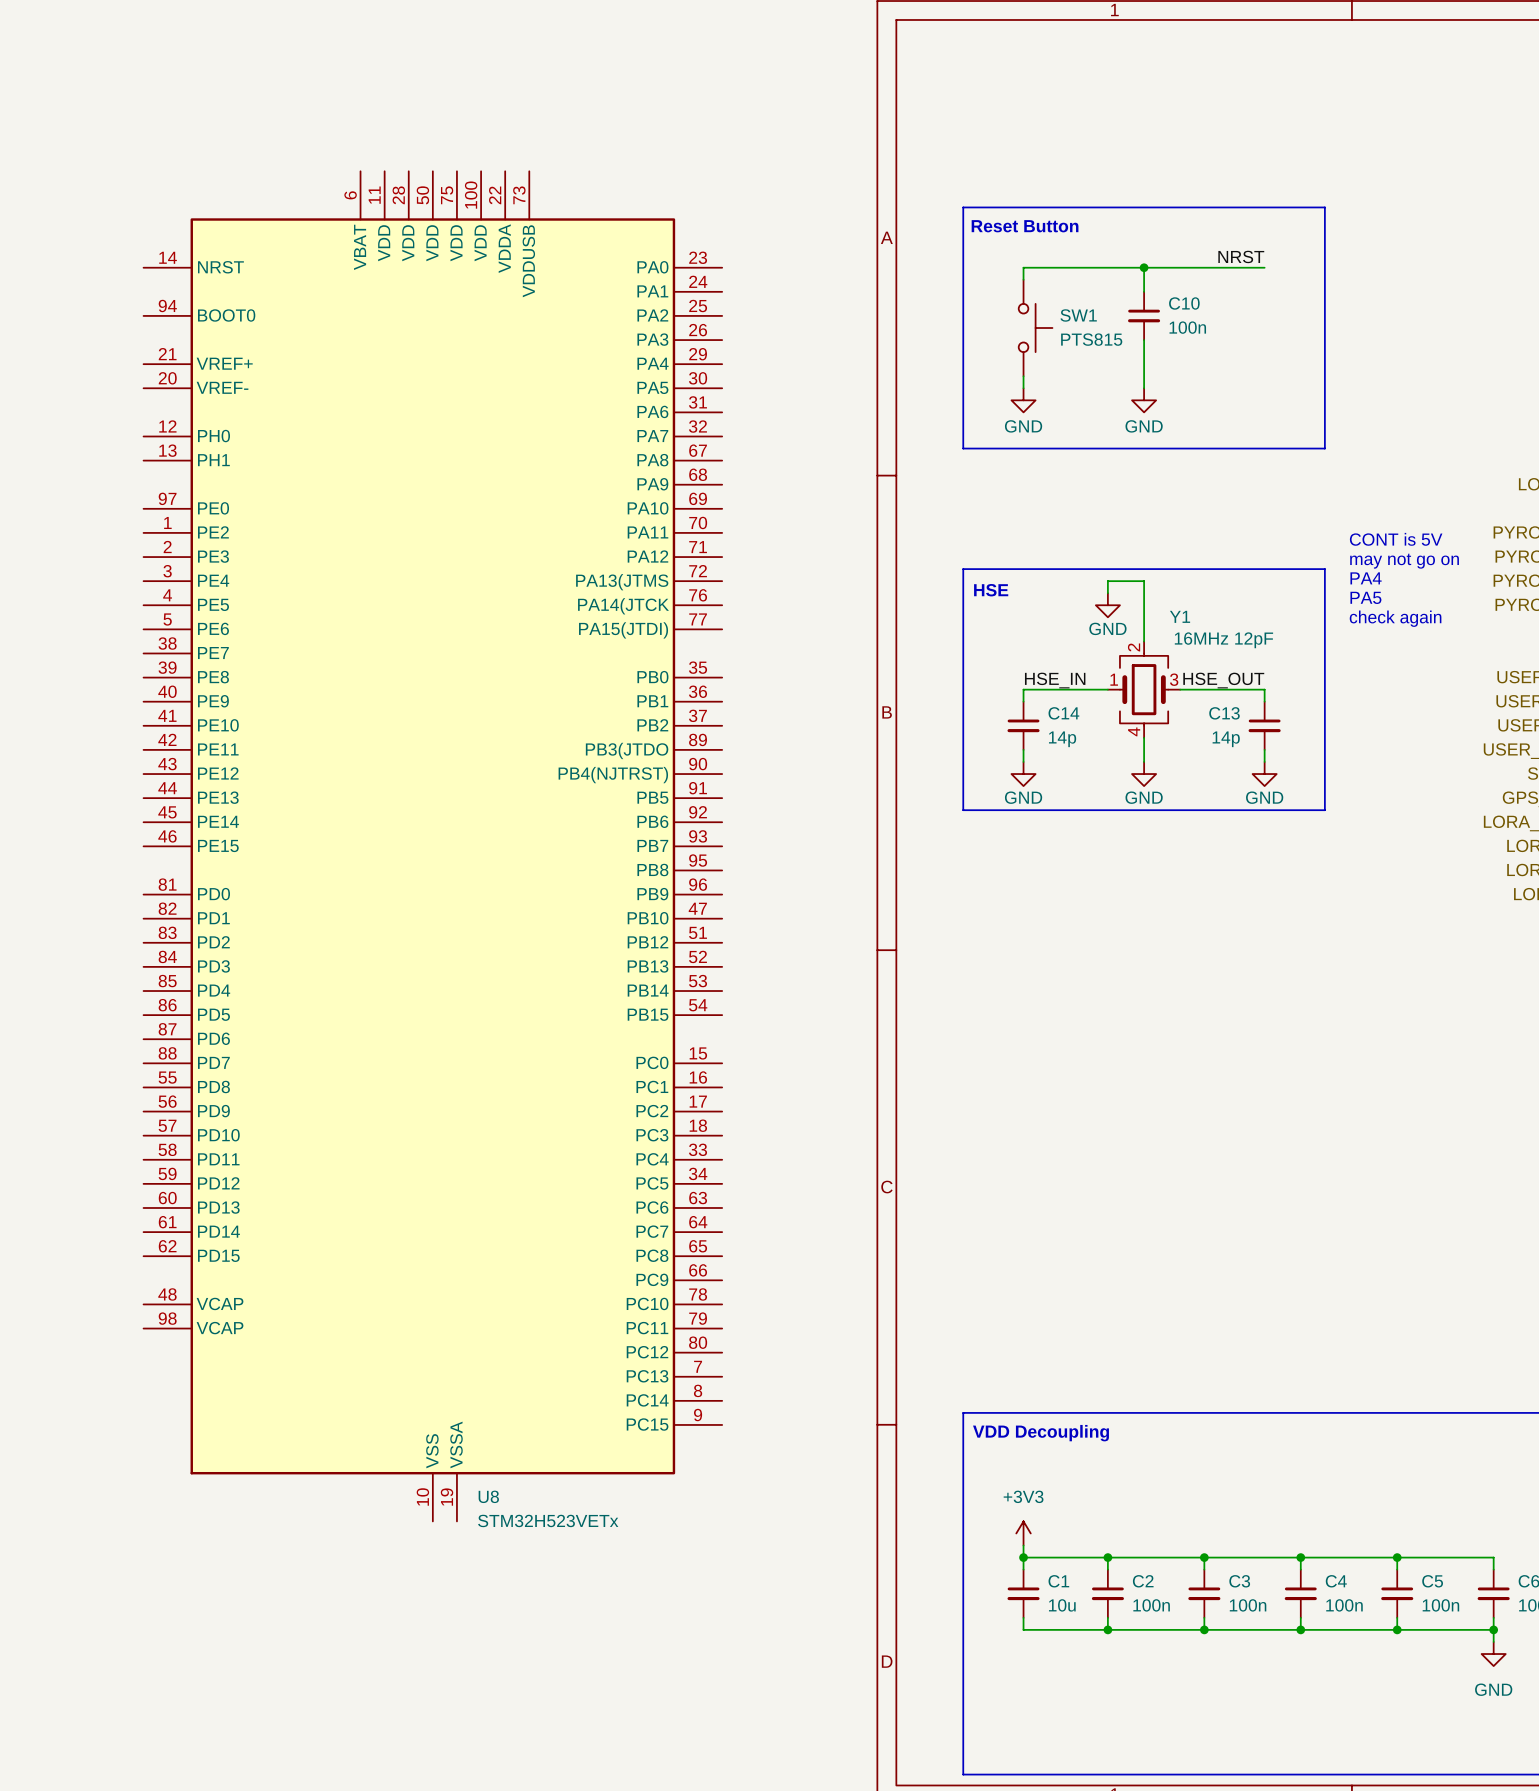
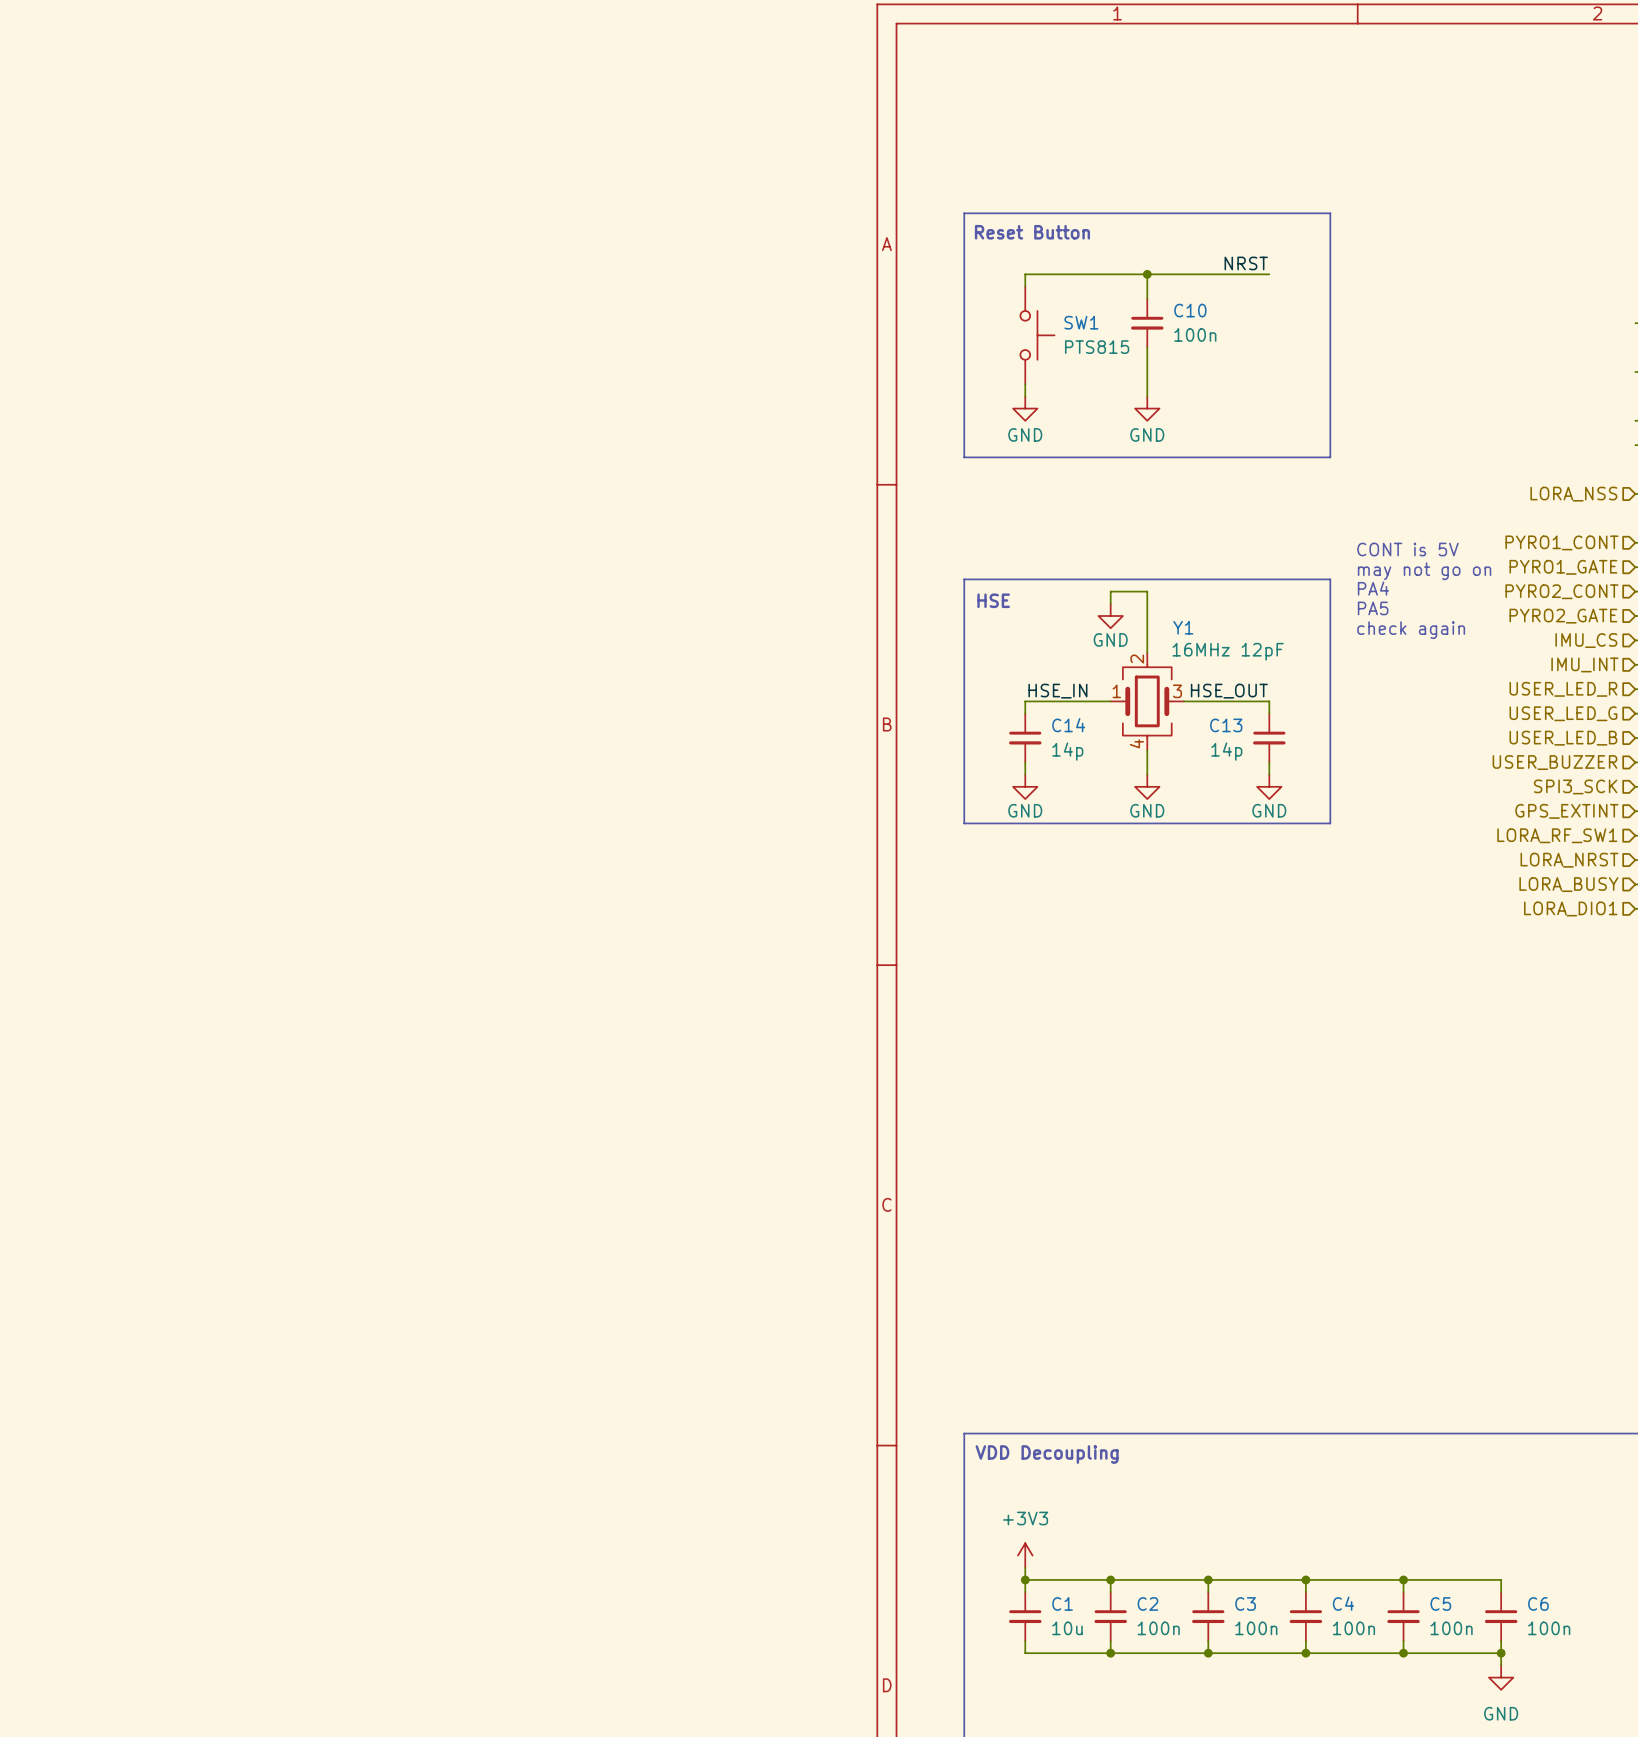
U8: STM32H523VETx (432, 846) -> none

